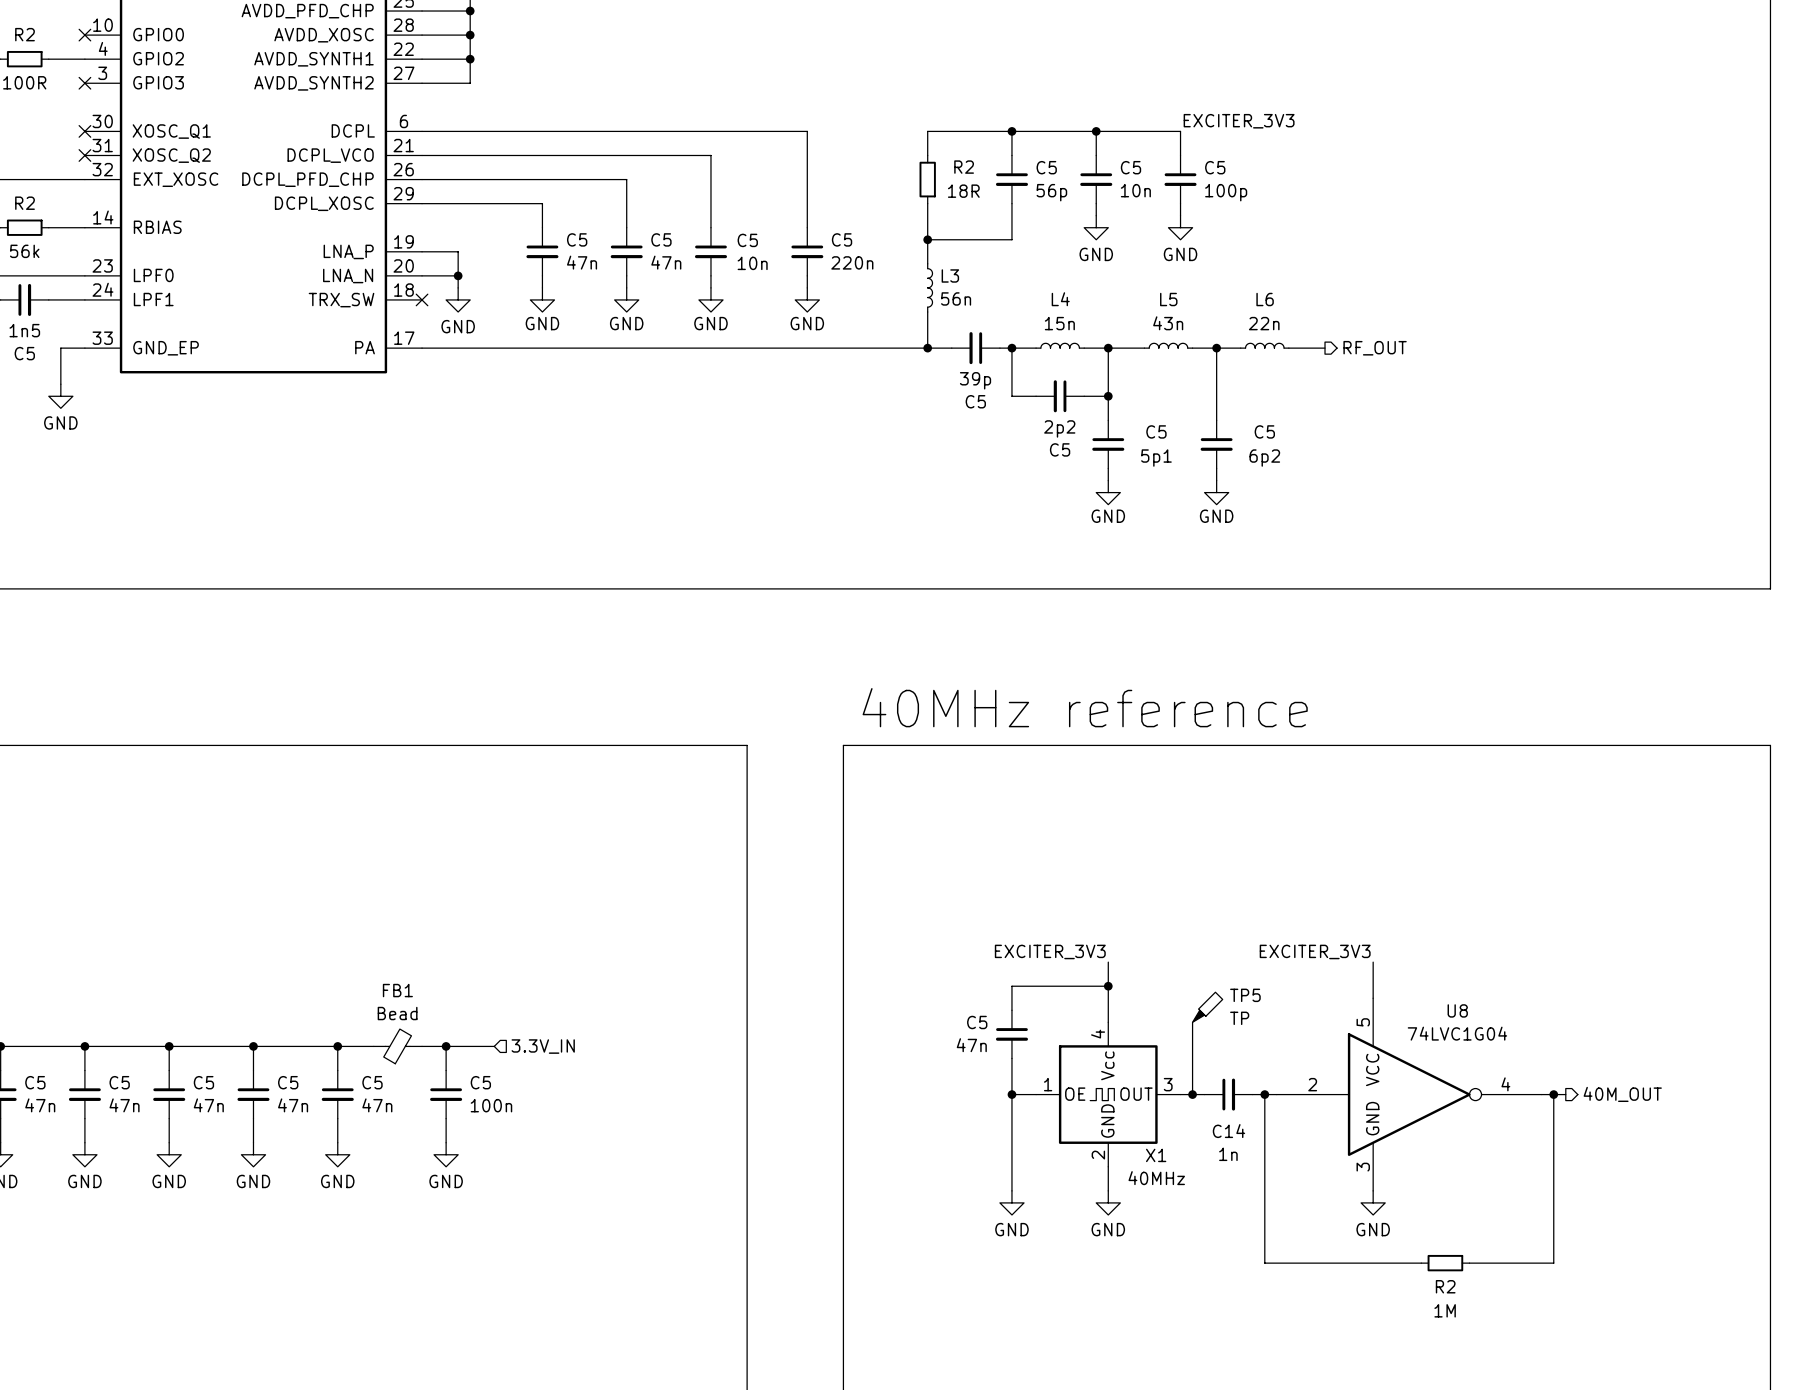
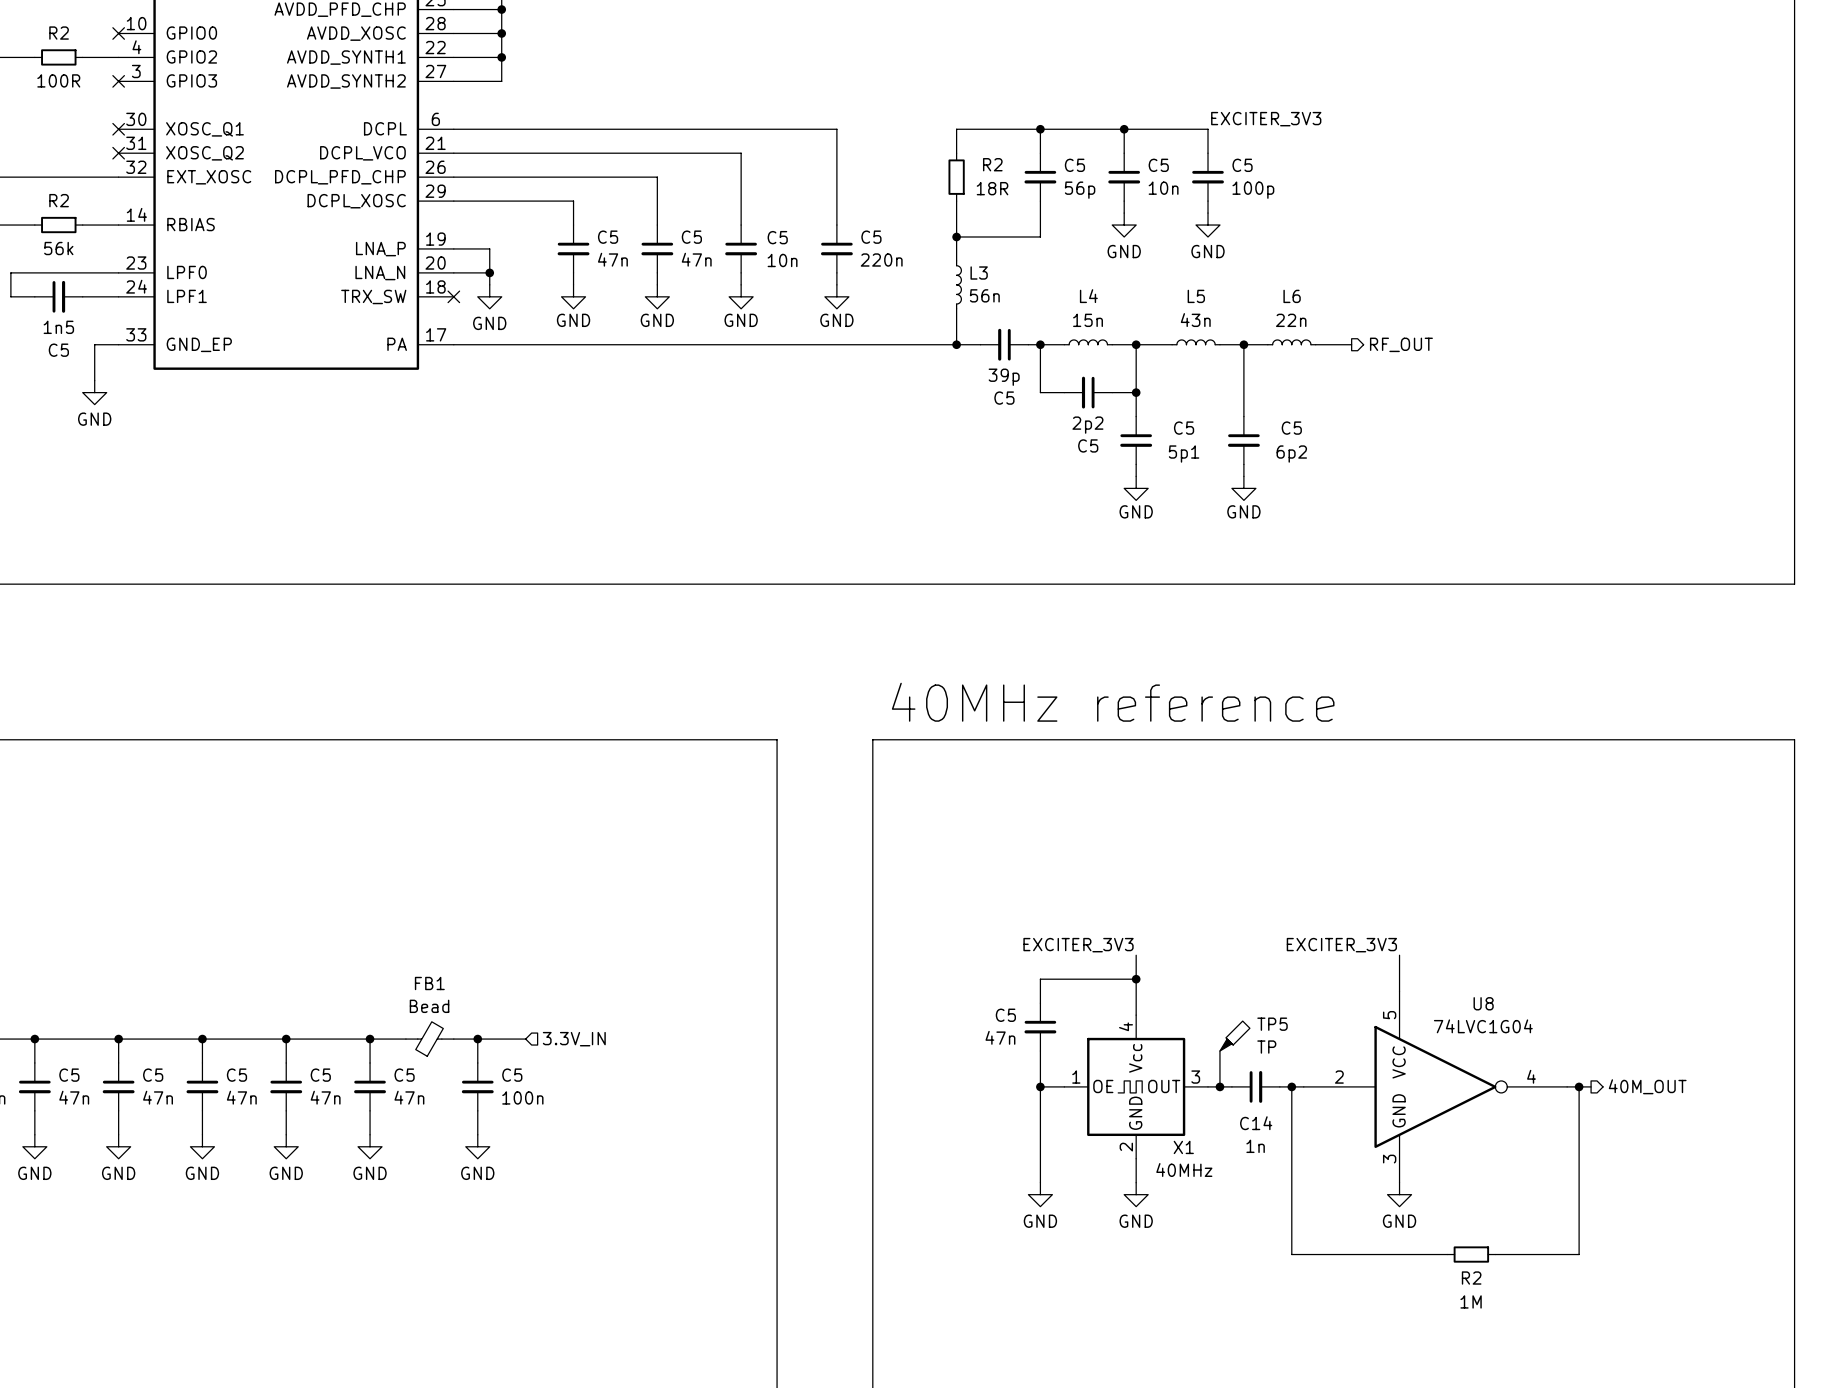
TP5 position: (1207, 1007) -> (1234, 1036)
wire: (1192, 1022) (1192, 1058) -> none

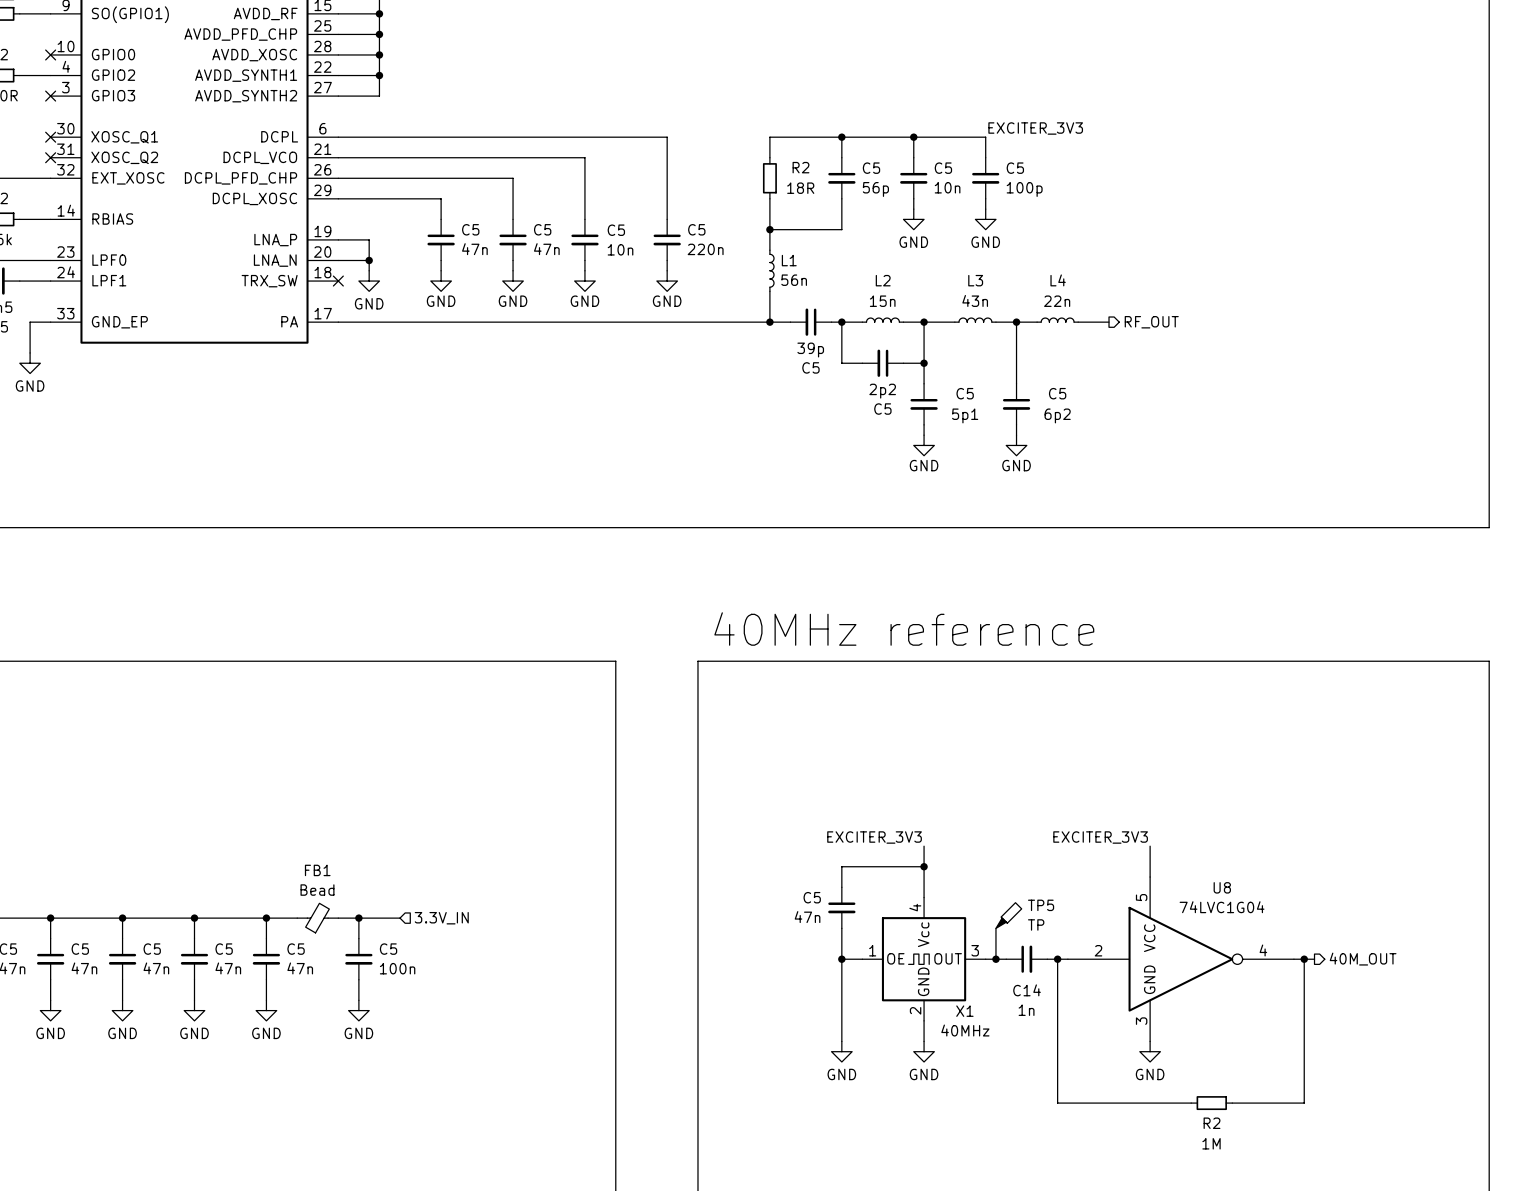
L3 name: L3 (979, 273) -> L1 (789, 260)
L4 name: L4 (1088, 296) -> L2 (883, 280)
L5 name: L5 (1196, 296) -> L3 (975, 280)
L6 name: L6 (1292, 296) -> L4 (1058, 280)

